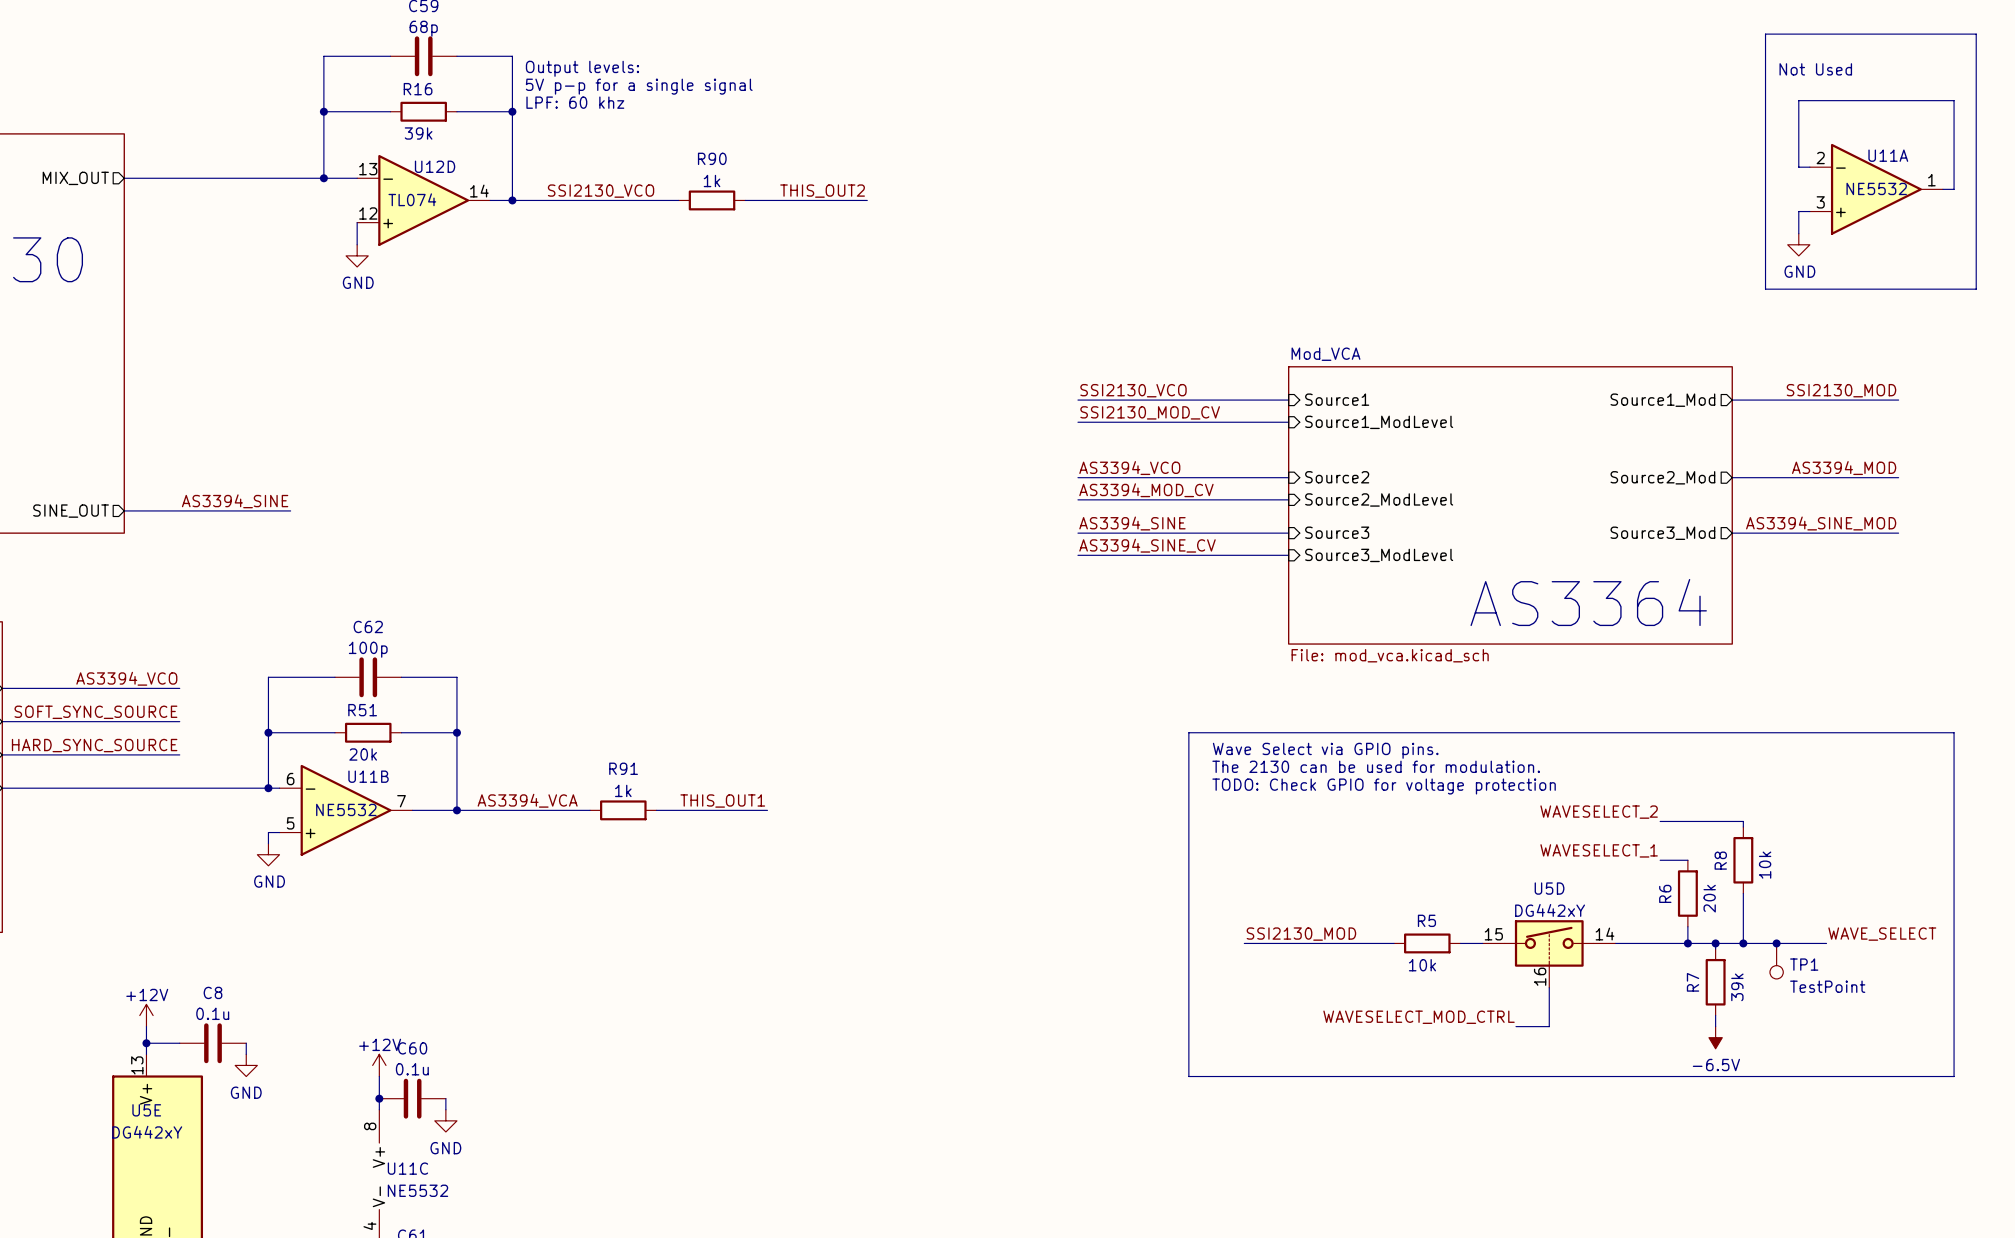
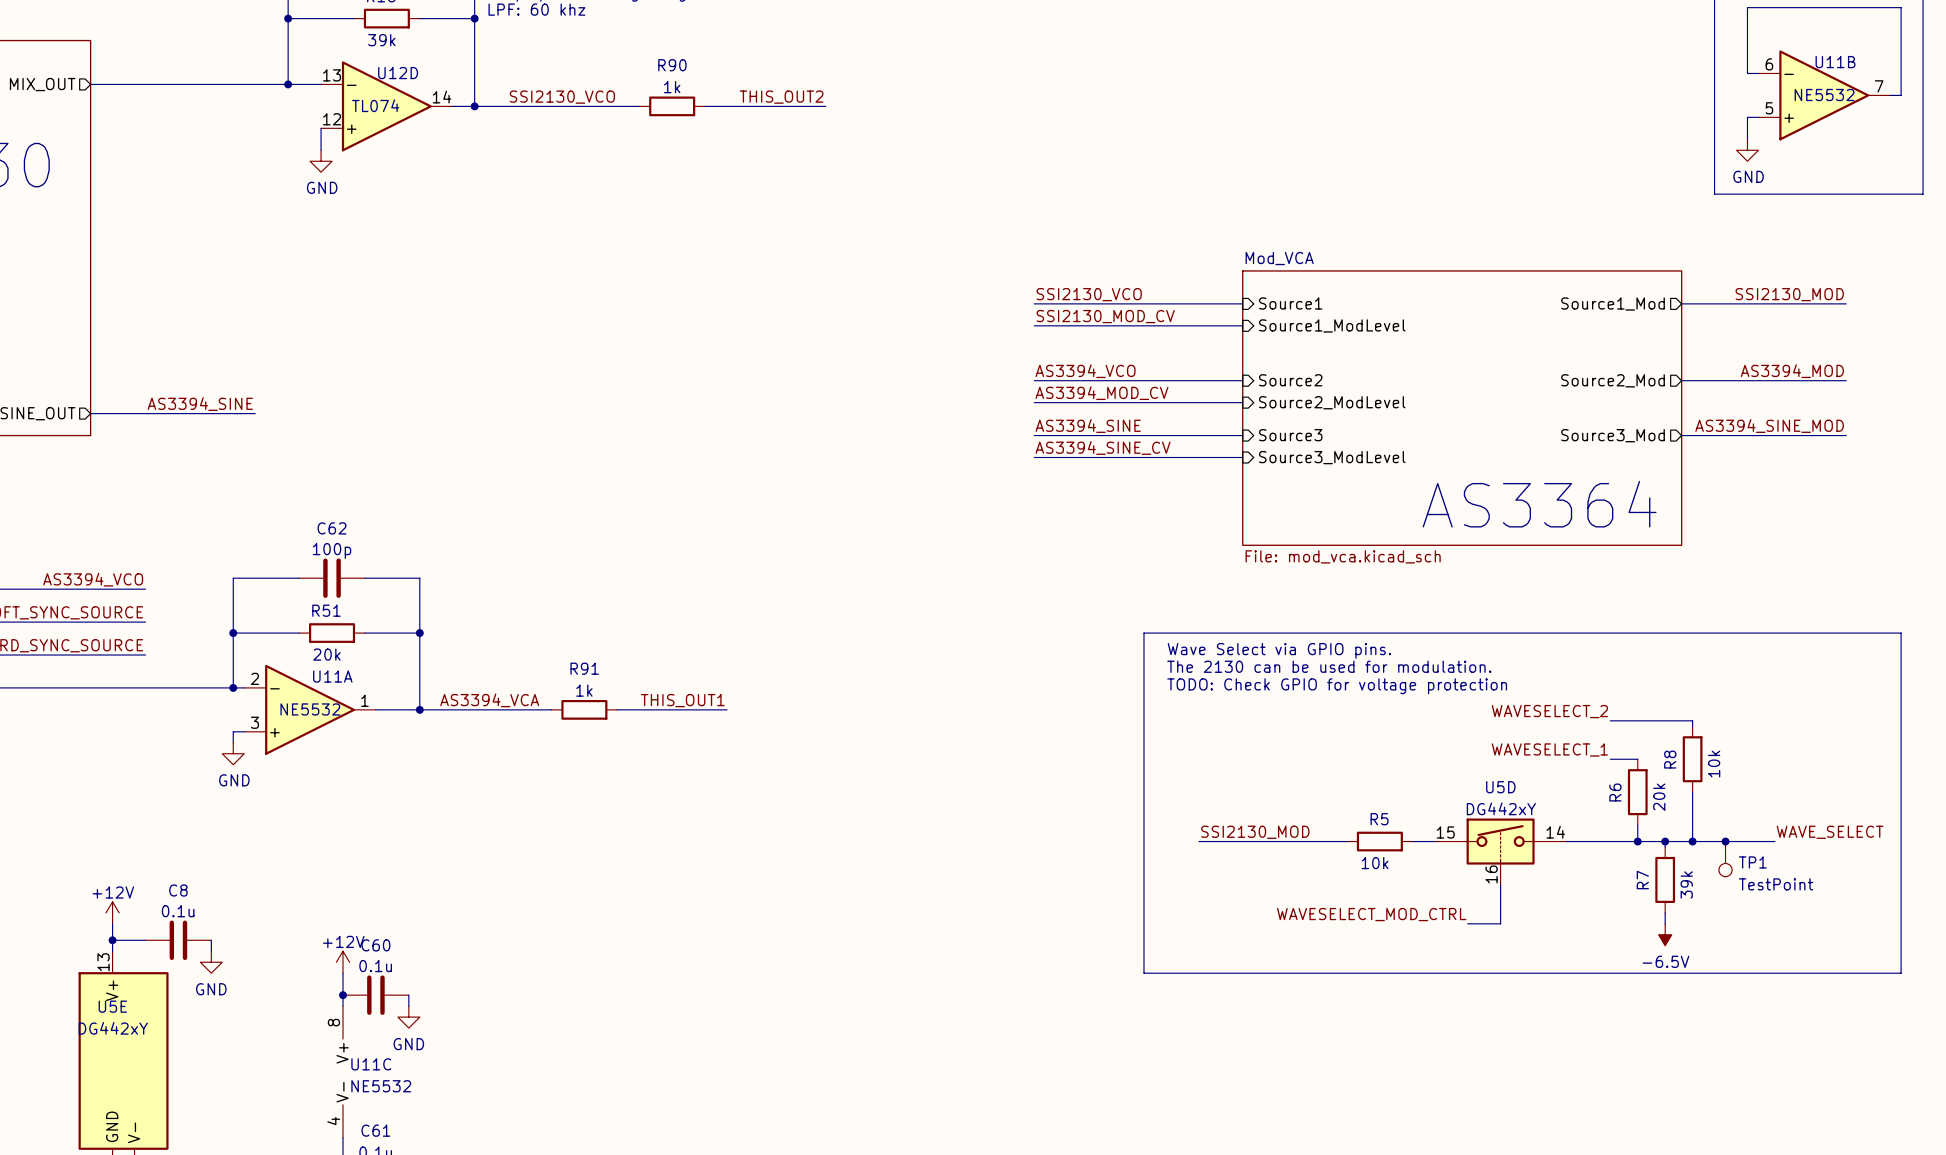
U11A name position: U11A (1888, 155) -> U11A (332, 676)
U11A position: (1876, 189) -> (310, 709)
U11B name position: U11B (368, 776) -> U11B (1835, 62)
U11B position: (346, 810) -> (1824, 95)

